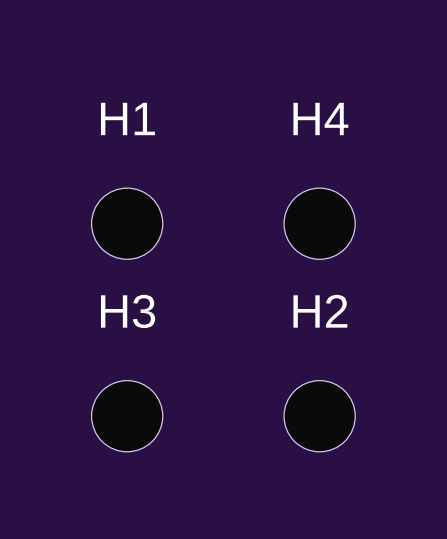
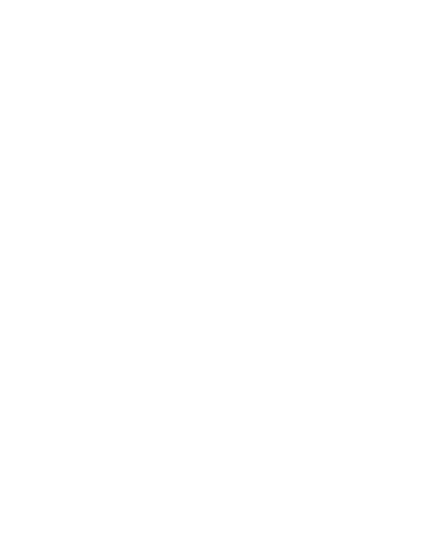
H1: (127, 223) -> none
H4: (319, 223) -> none
H3: (127, 416) -> none
H2: (319, 416) -> none

